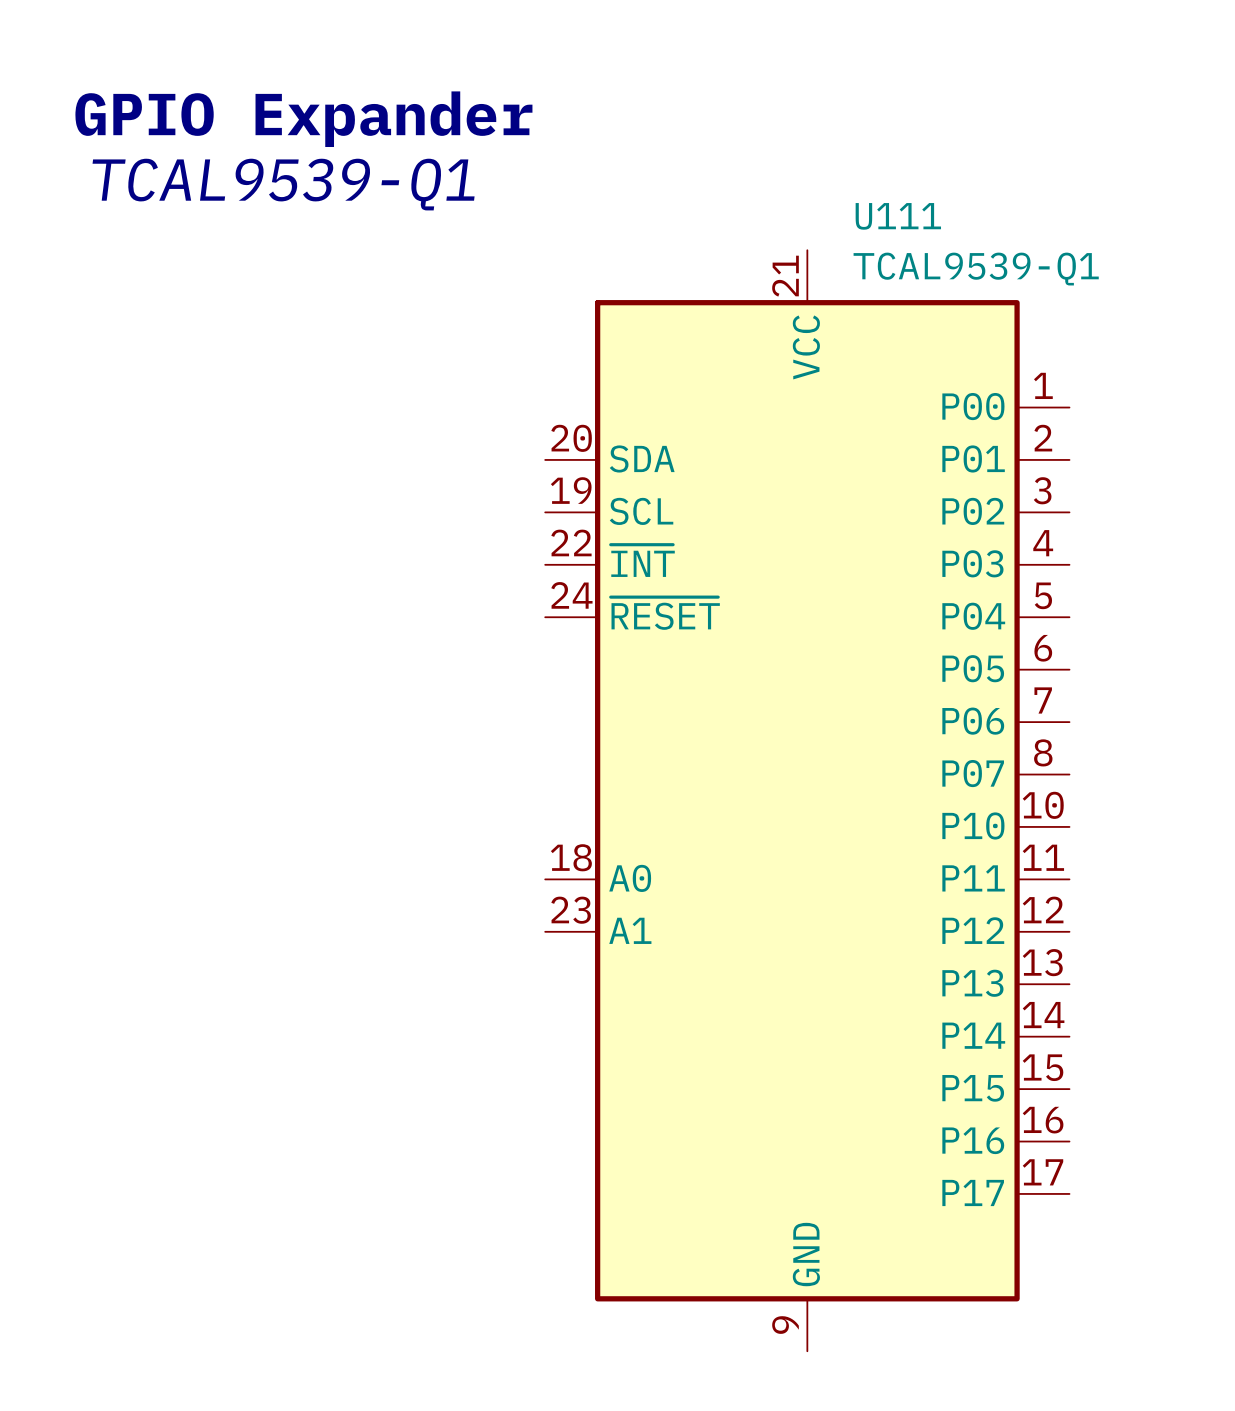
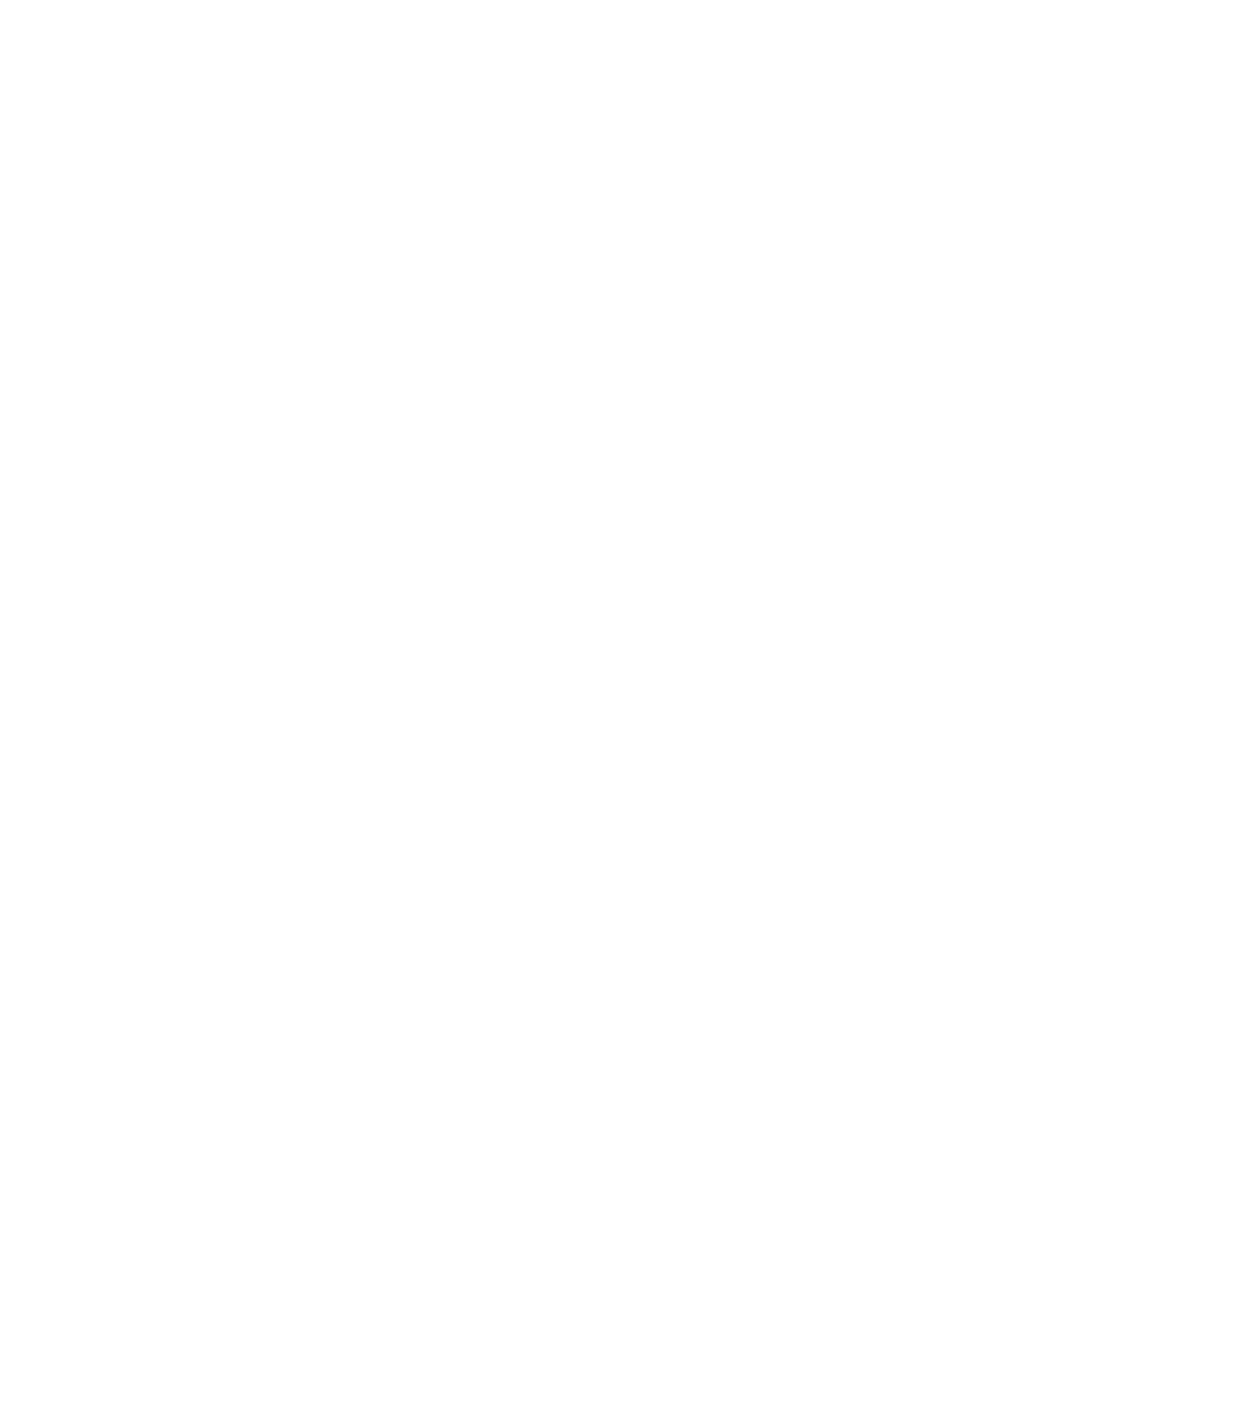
text: GPIO Expander (303, 119) -> none
text: TCAL9539-Q1 (283, 184) -> none
U111: TCAL9539-Q1 (807, 800) -> none

